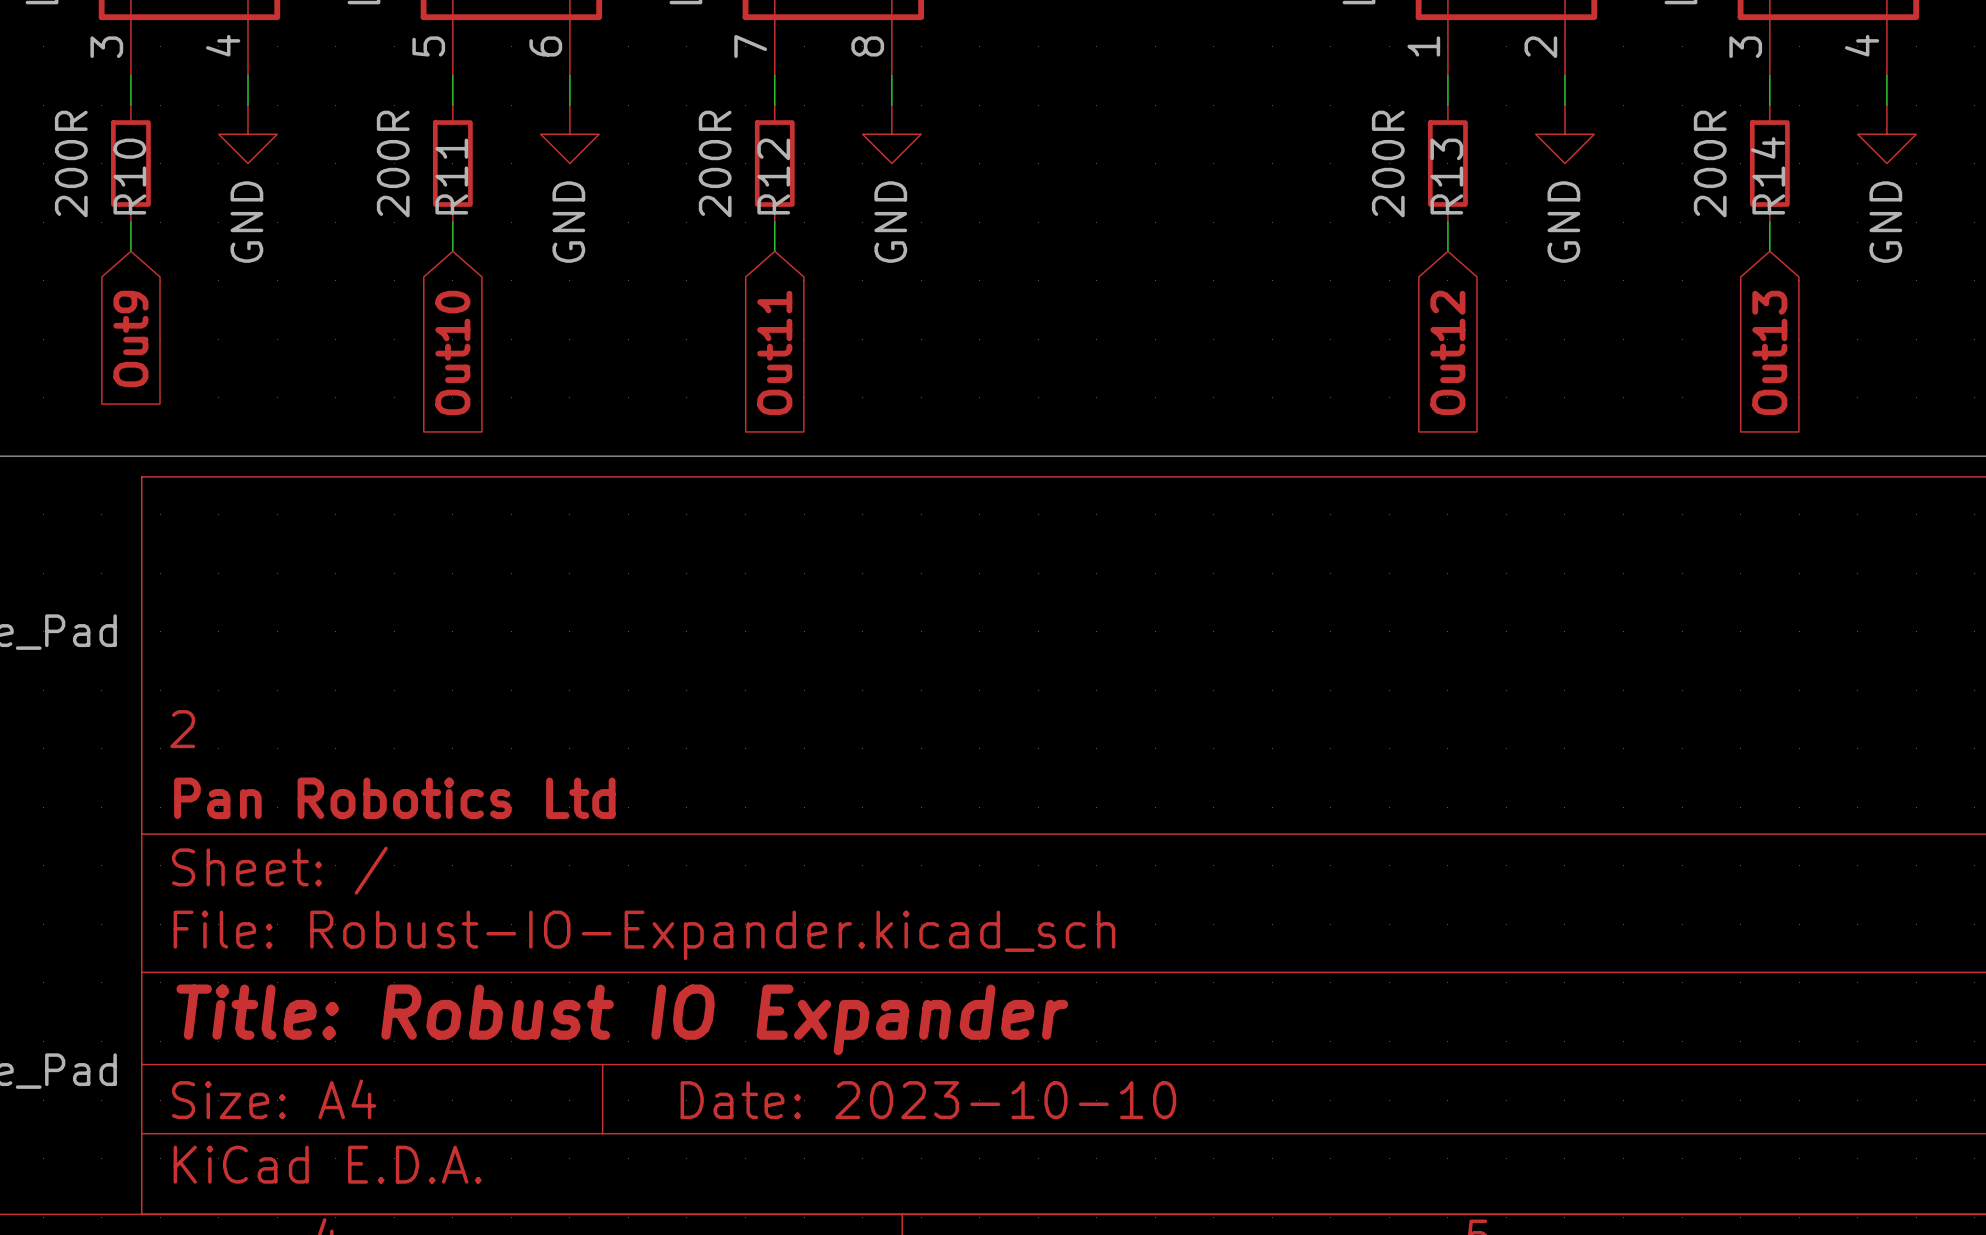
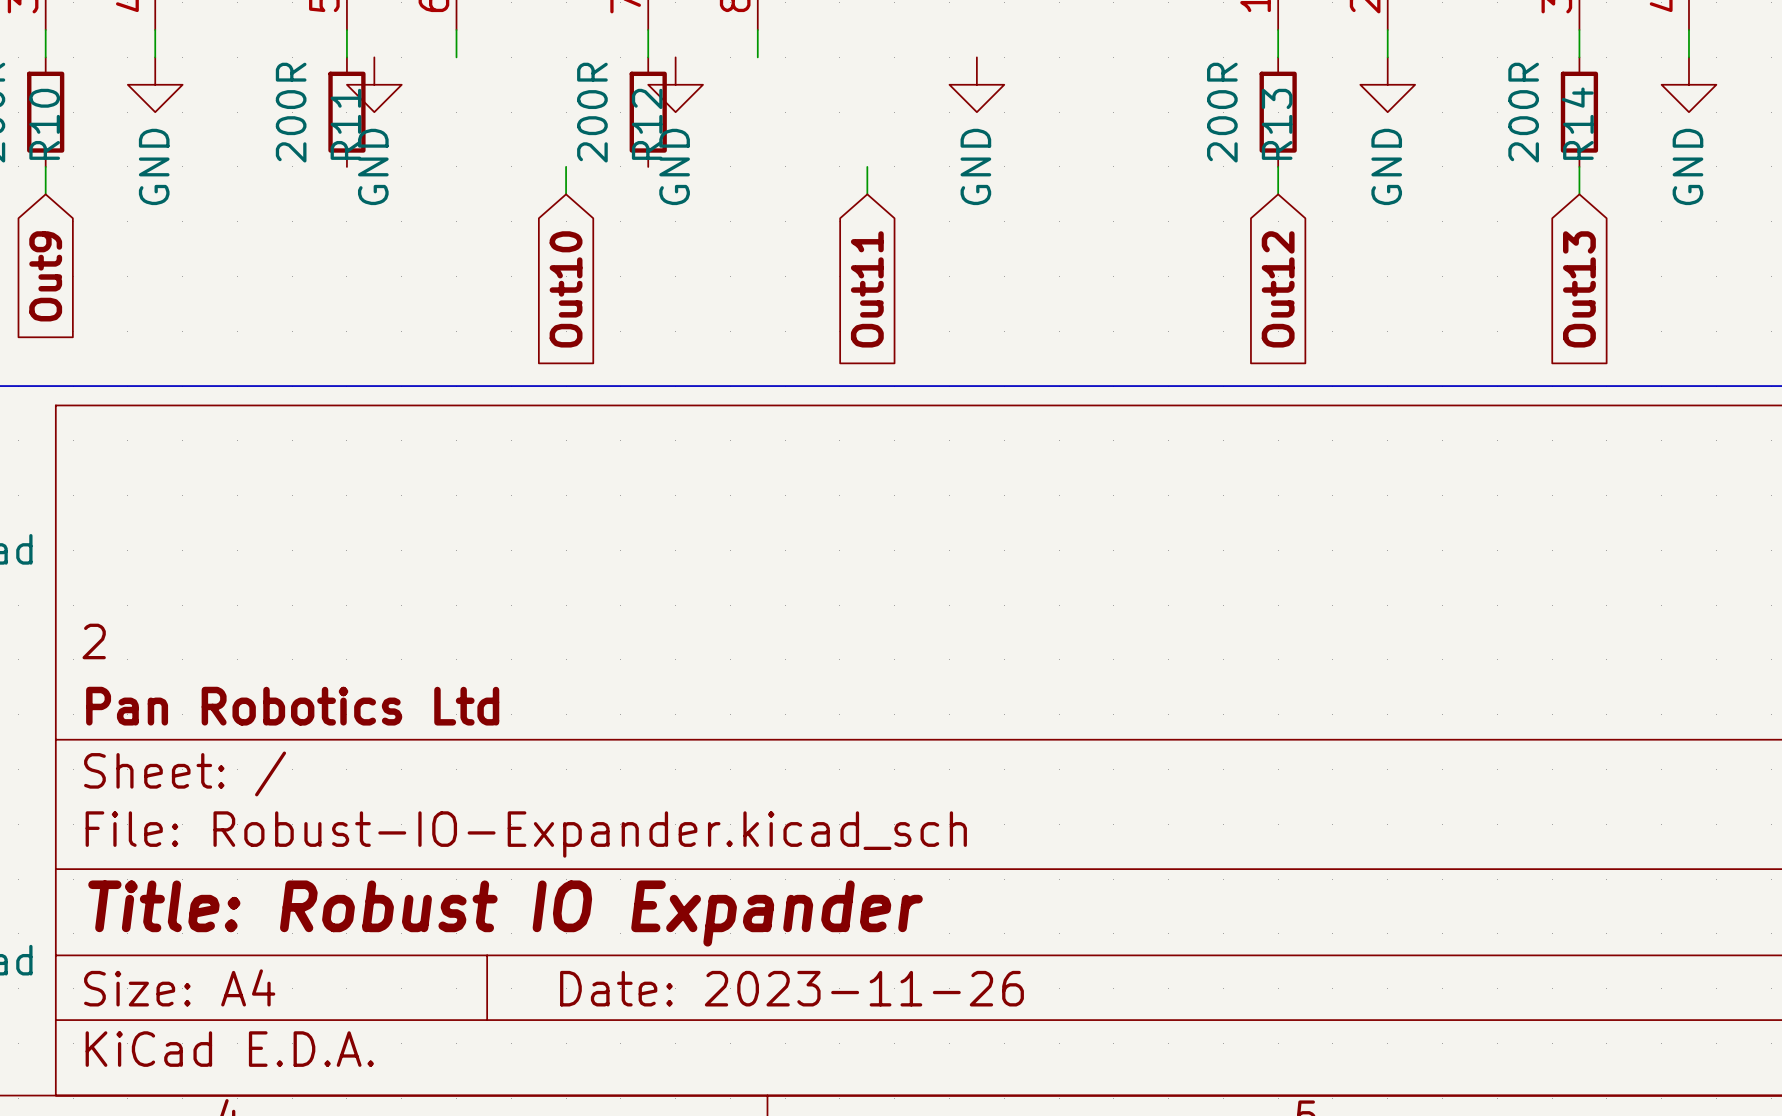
power symbol position: GND (569, 134) -> GND (374, 84)
power symbol position: GND (891, 134) -> GND (675, 84)
power symbol: none -> GND (976, 84)
wire: (452, 222) (452, 251) -> (566, 166) (566, 194)
wire: (774, 222) (774, 251) -> (867, 166) (867, 194)
global label position: Out10 (452, 352) -> Out10 (566, 289)
global label position: Out11 (774, 352) -> Out11 (867, 289)
title block: Date: 2023-10-10 (928, 1100) -> Date: 2023-11-26 (791, 988)

